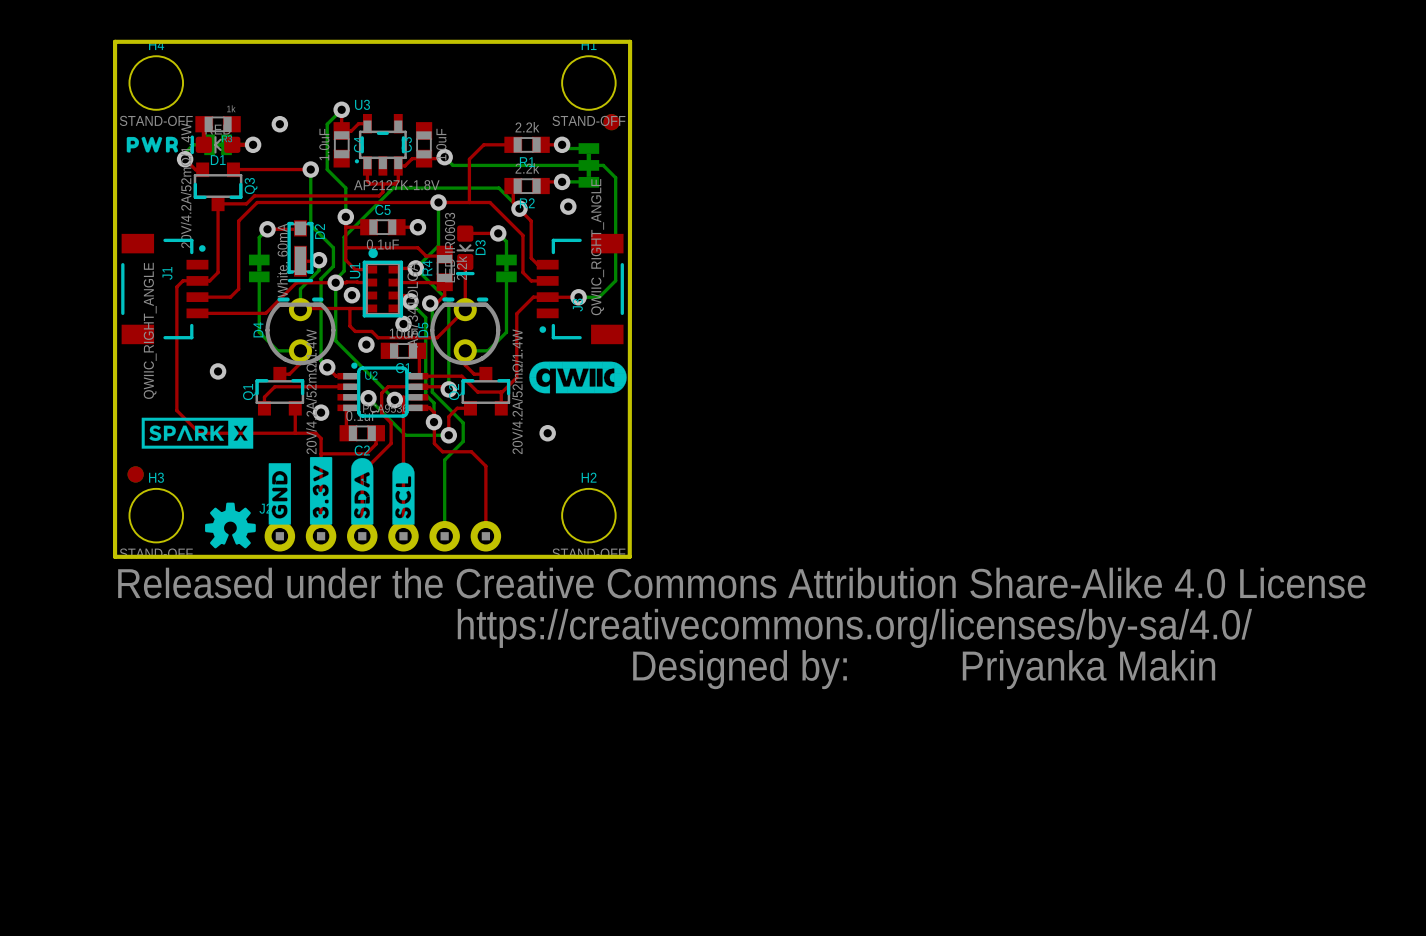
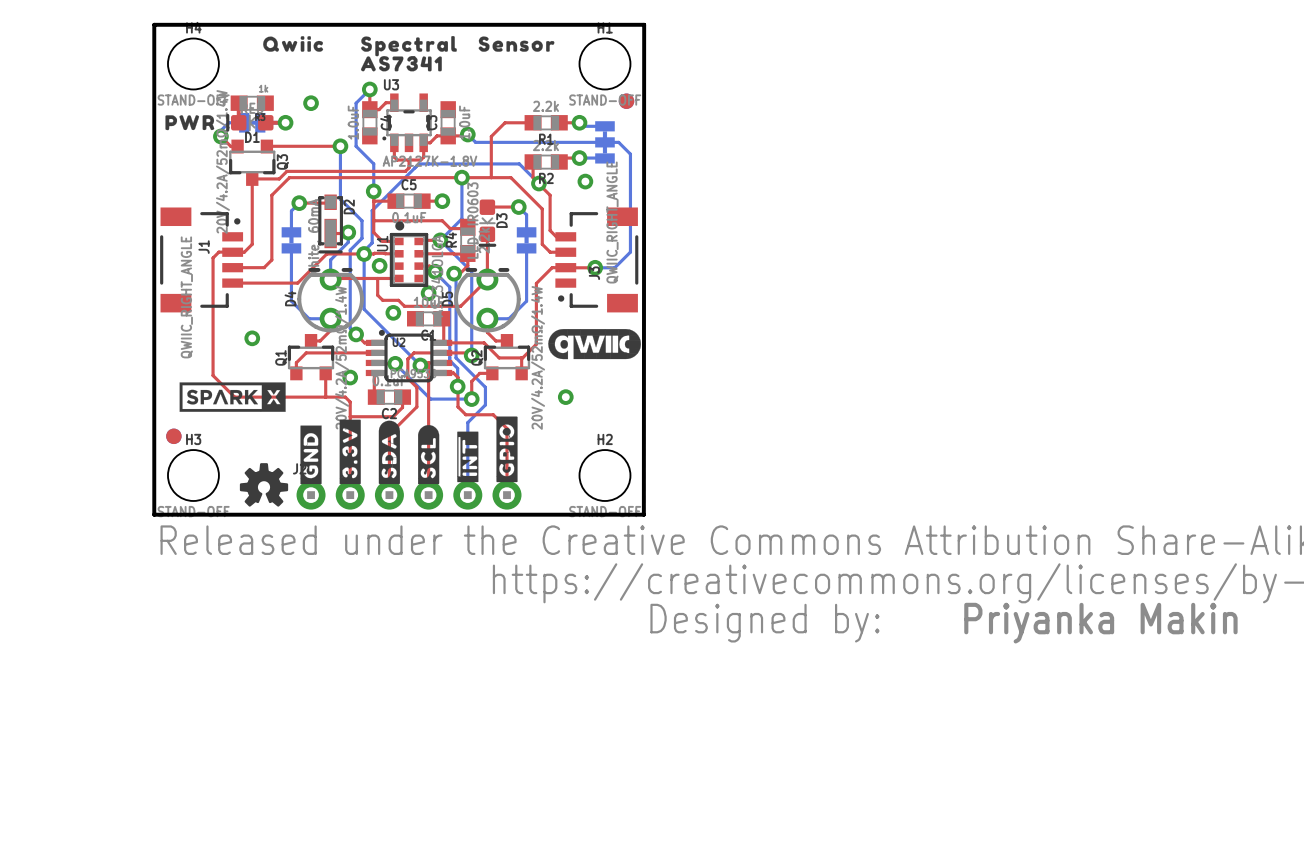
drawing: none -> [263, 36, 324, 52]
drawing: none -> [360, 35, 457, 72]
drawing: none -> [478, 36, 555, 52]
drawing: none -> [457, 416, 518, 483]

